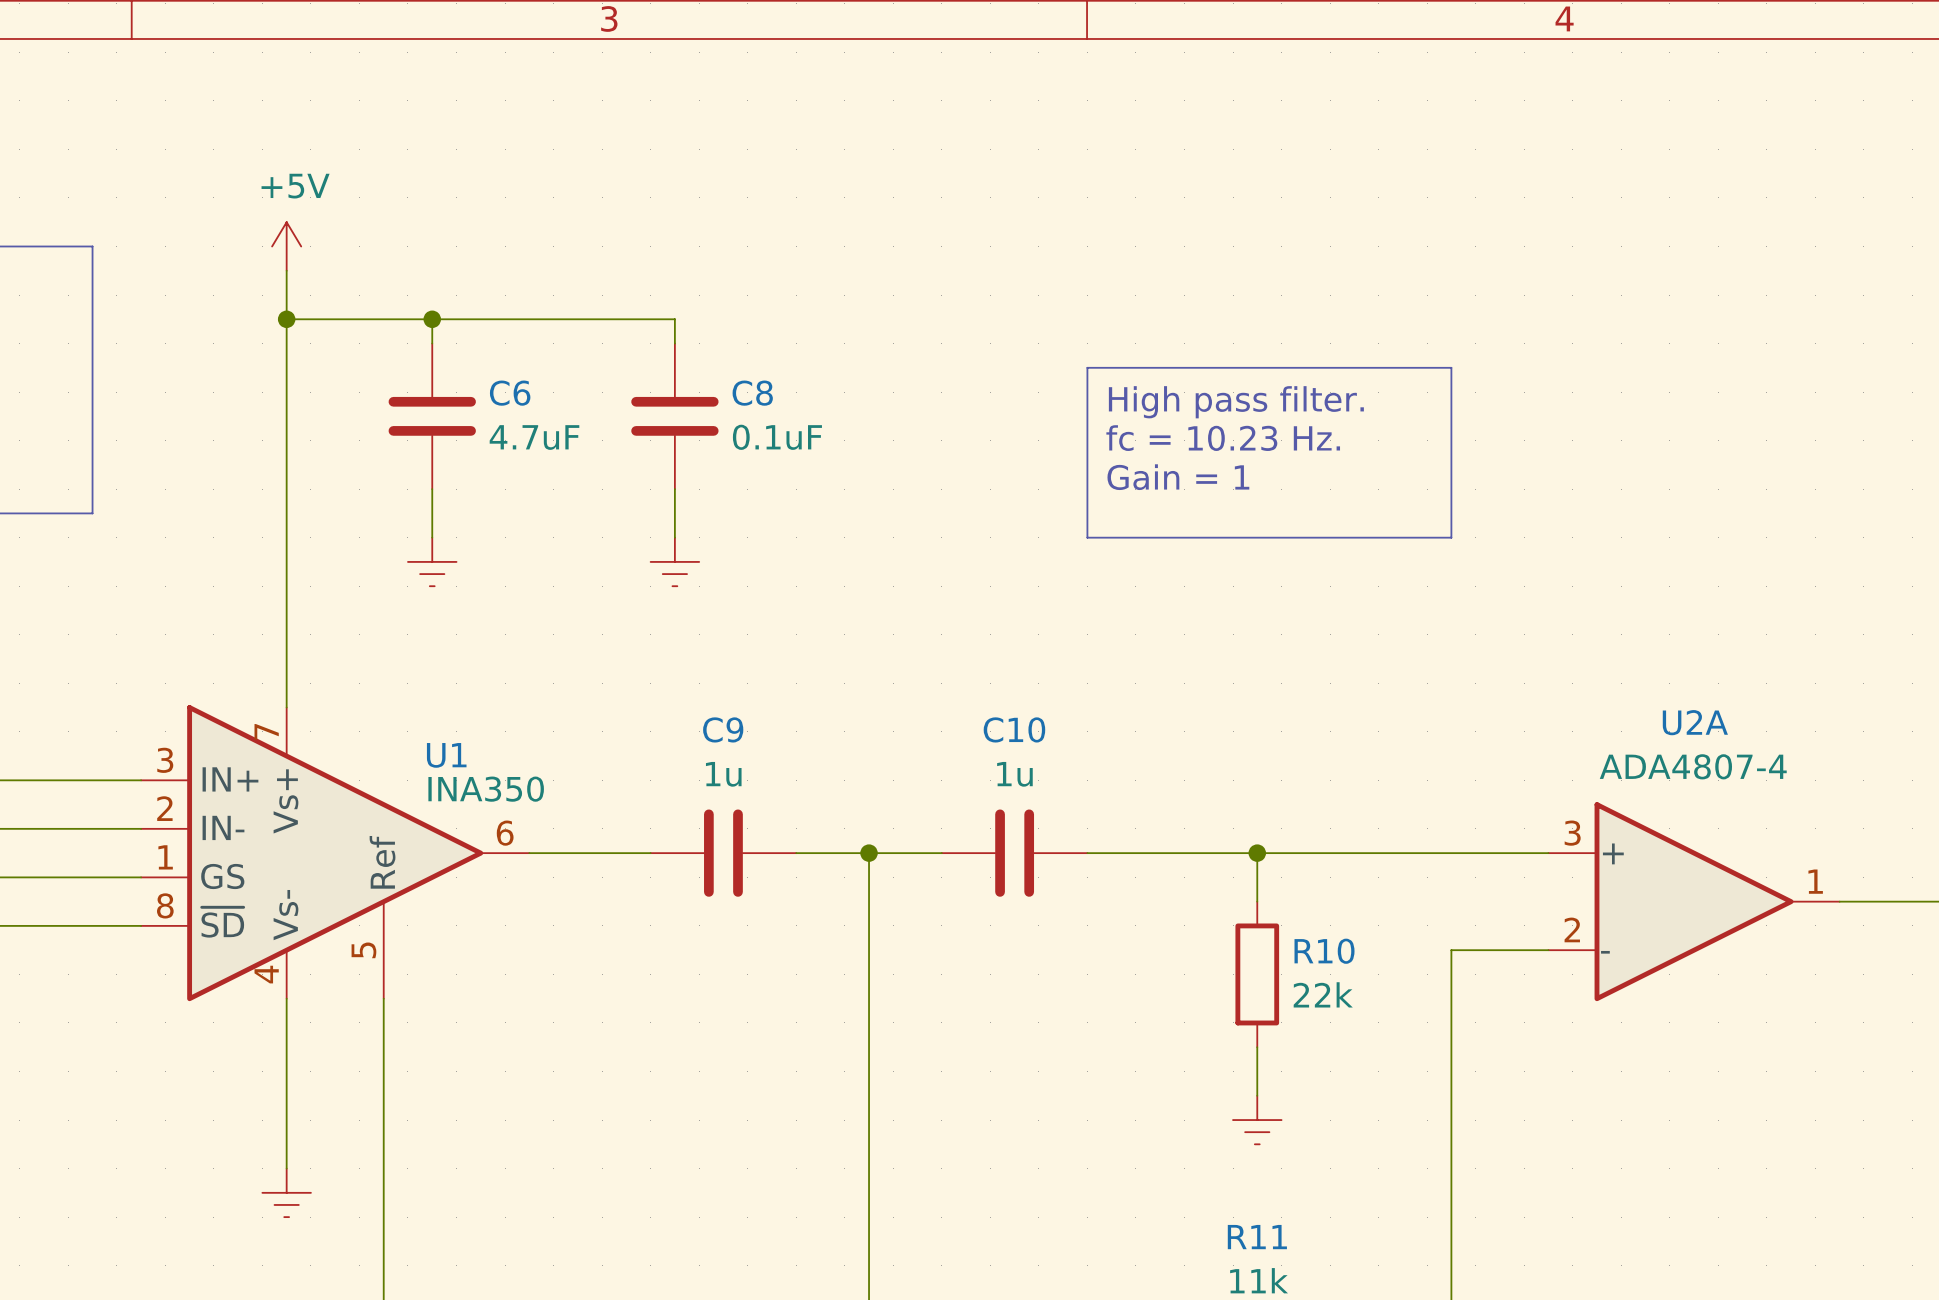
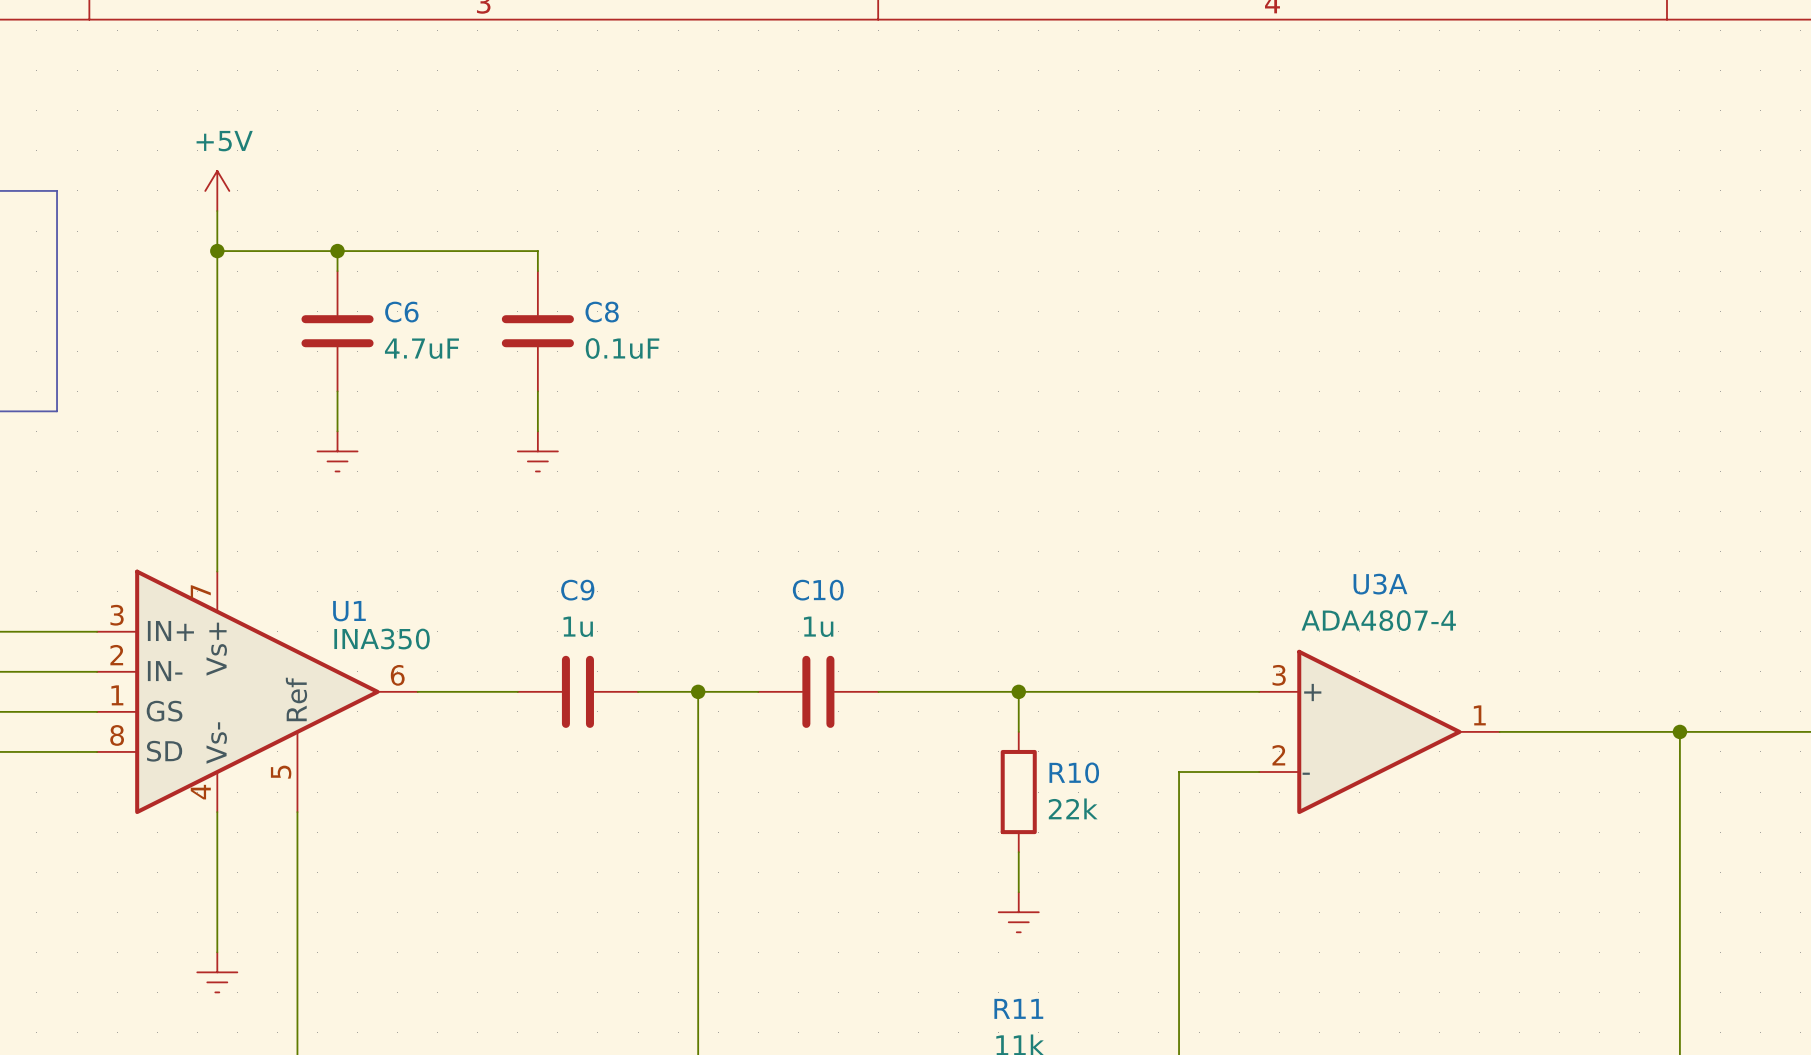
line: (1087, 367) (1451, 367) (1451, 537) (1087, 537) (1087, 367) -> none
text: High pass filter. (1236, 402) -> none
text: fc = 10.23 Hz. (1223, 438) -> none
text: Gain = 1 (1178, 477) -> none
U2A name: U2A (1695, 722) -> U3A (1380, 584)
U1 pin name: ~{SD} (222, 922) -> SD (164, 751)

